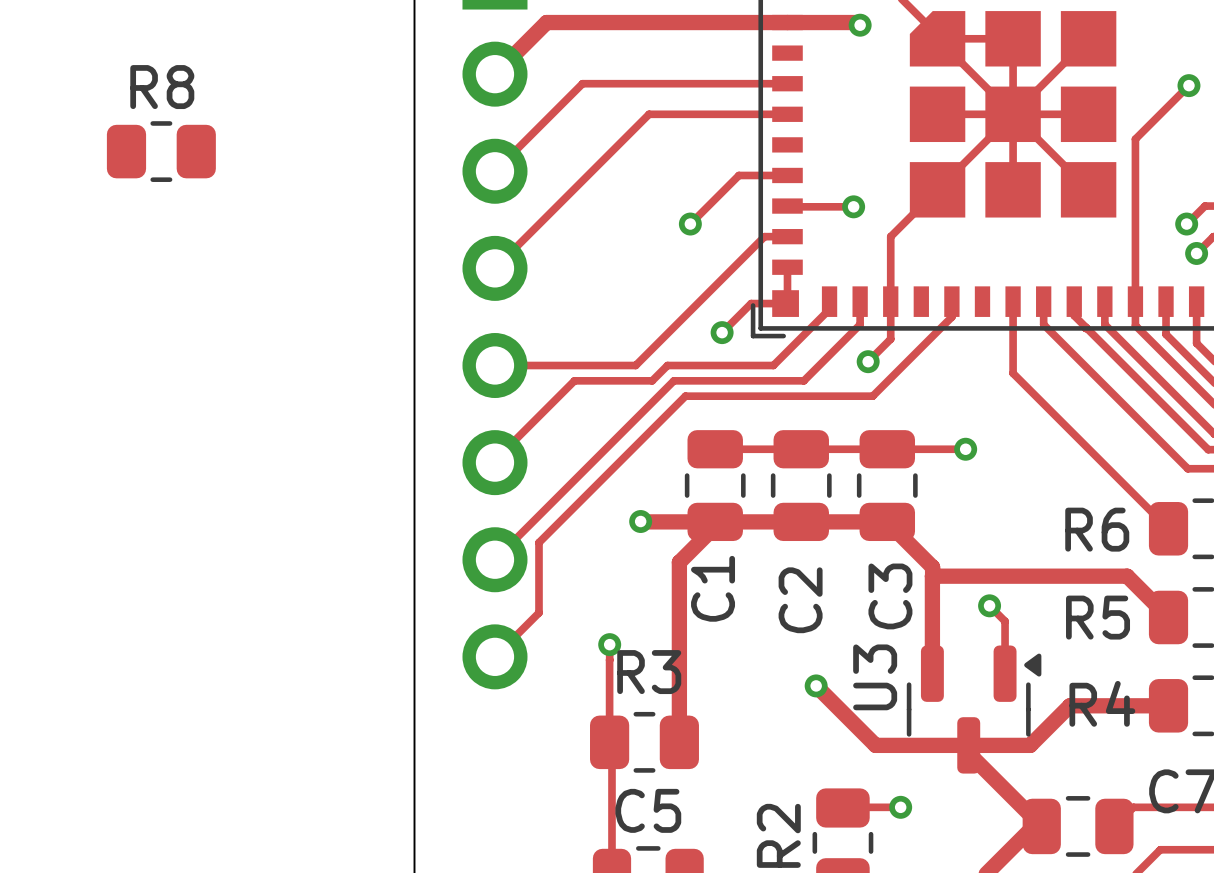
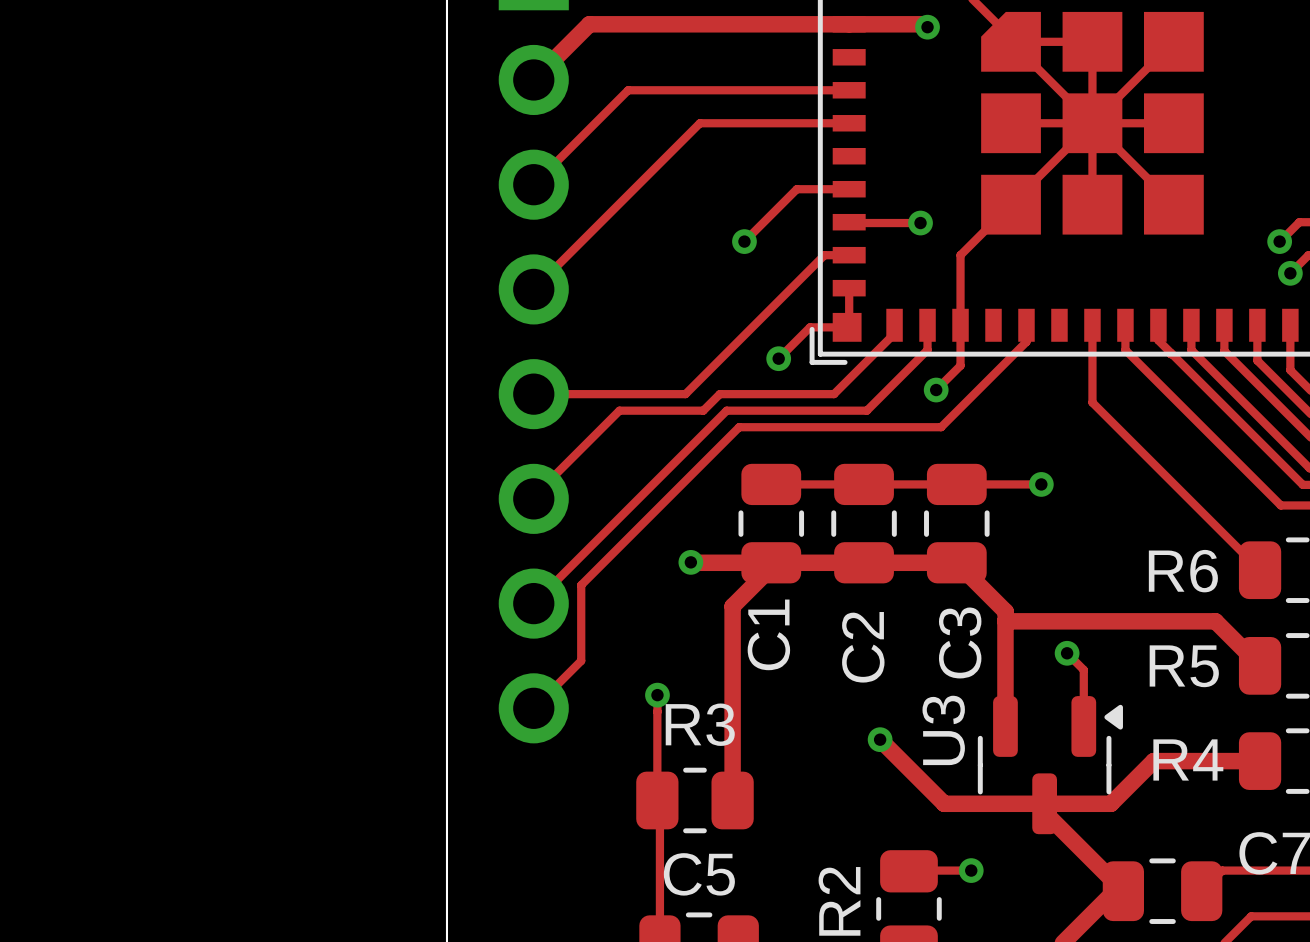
track: (1188, 85) (1135, 139) (1135, 301) -> none
via: (1188, 85) -> none
R8: (161, 151) -> none

